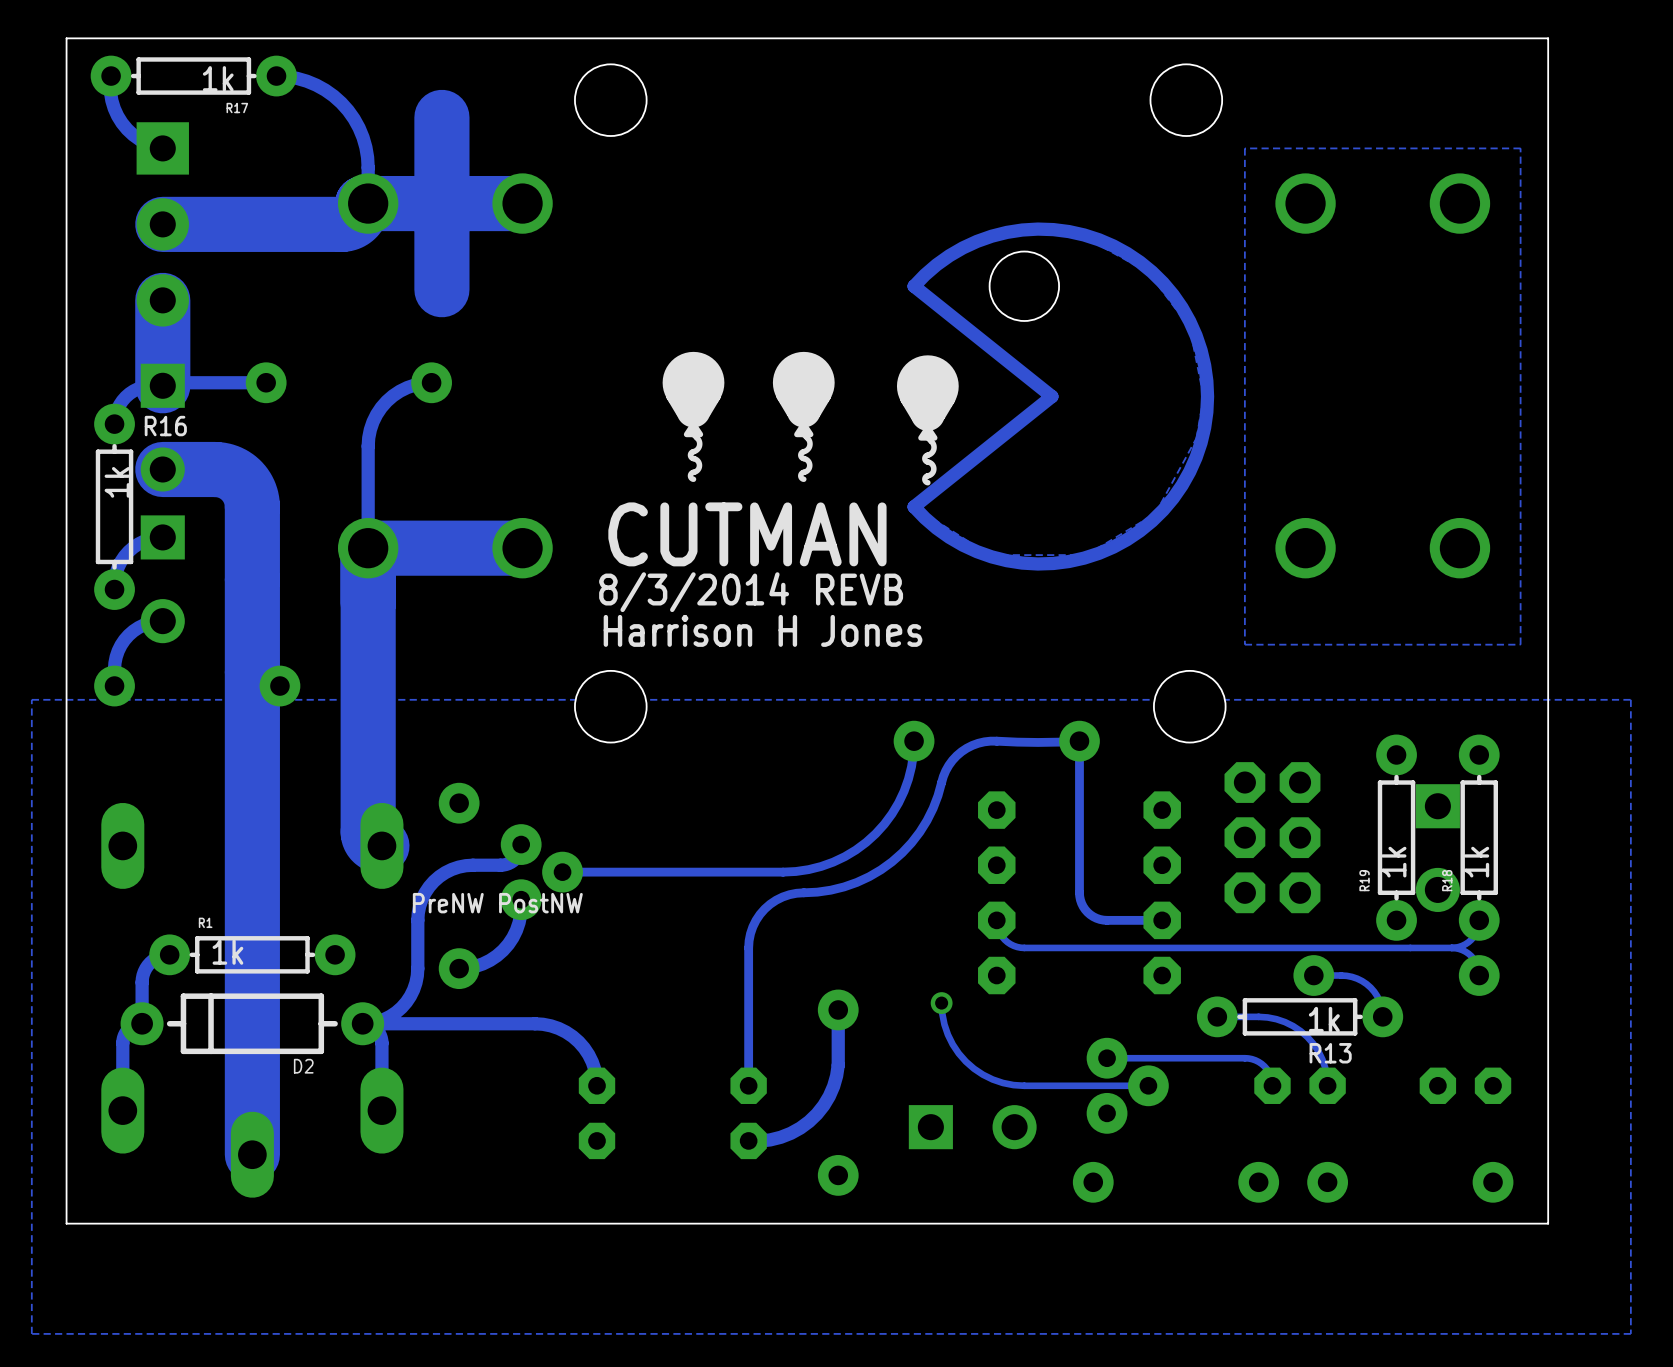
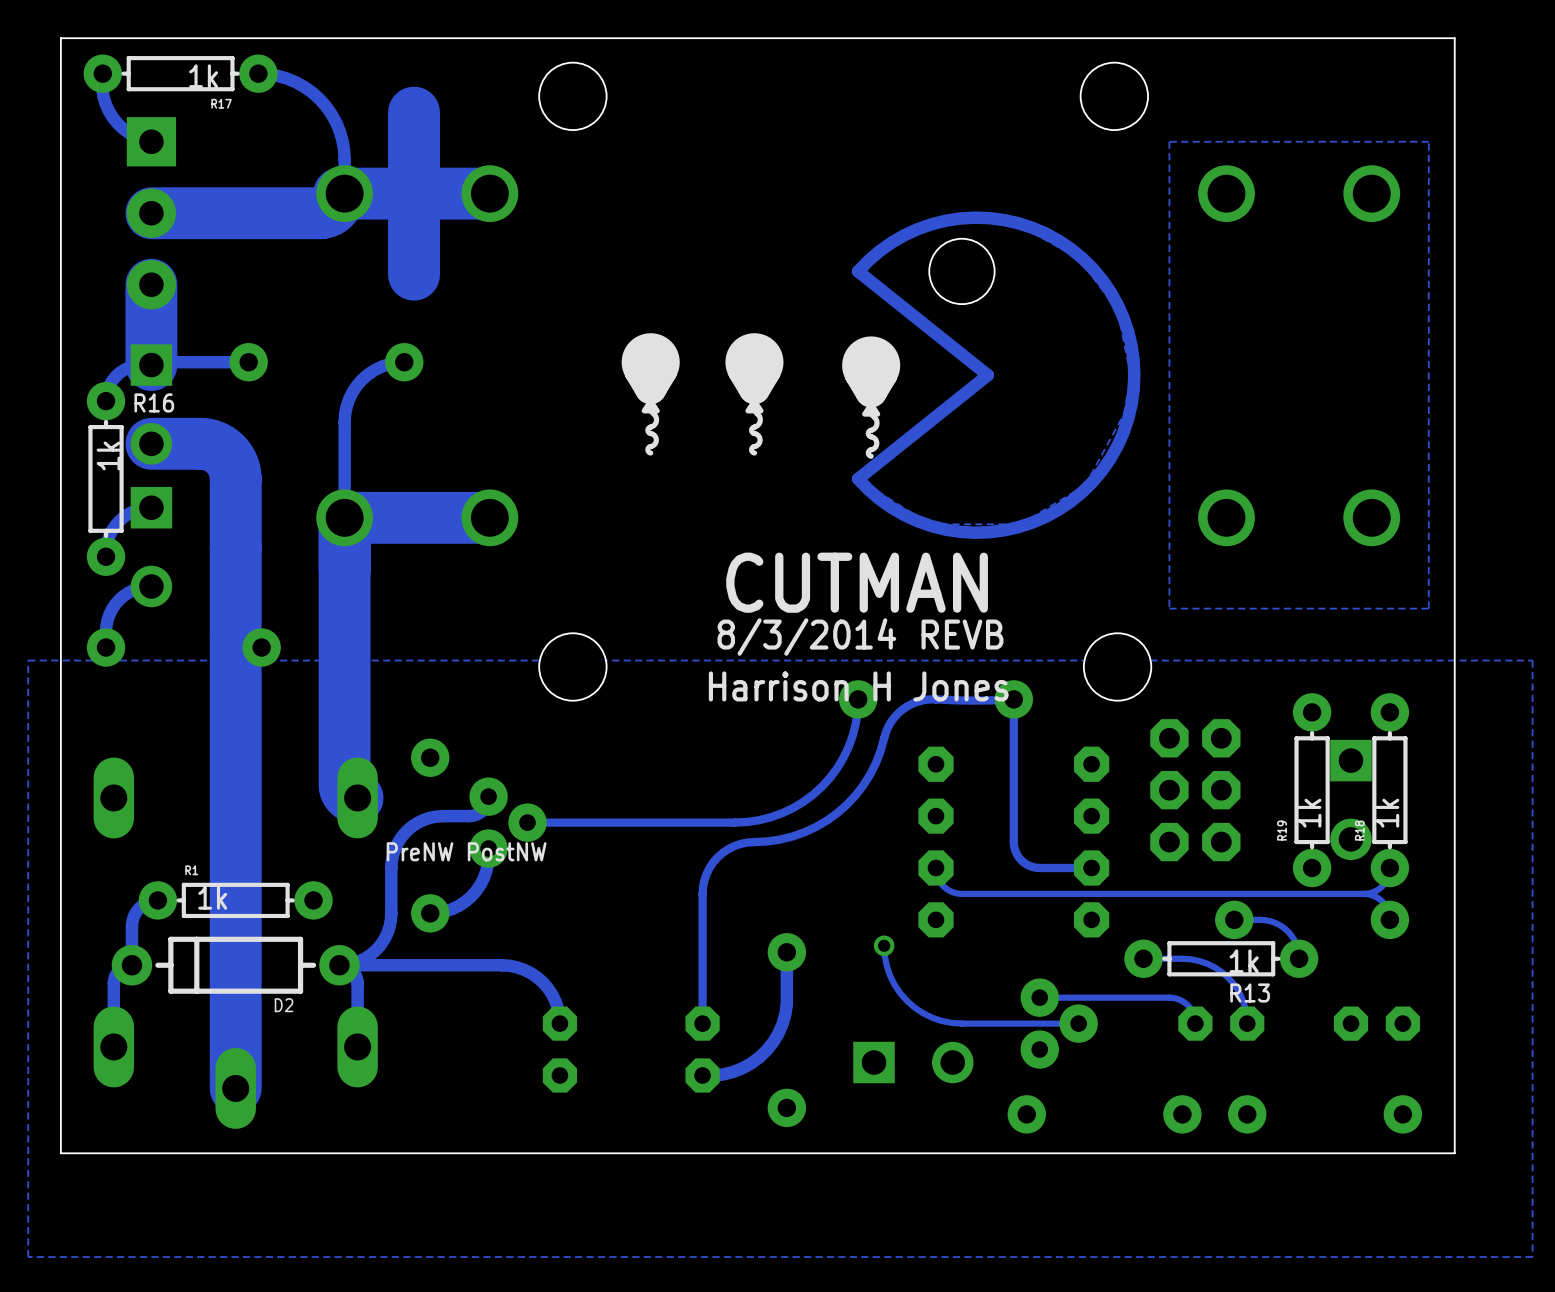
text position: CUTMAN (747, 534) -> CUTMAN (857, 582)
text position: REVB (859, 589) -> REVB (962, 634)
text position: 8/3/2014 (694, 592) -> 8/3/2014 (806, 637)
text position: Harrison H Jones (763, 630) -> Harrison H Jones (858, 686)

